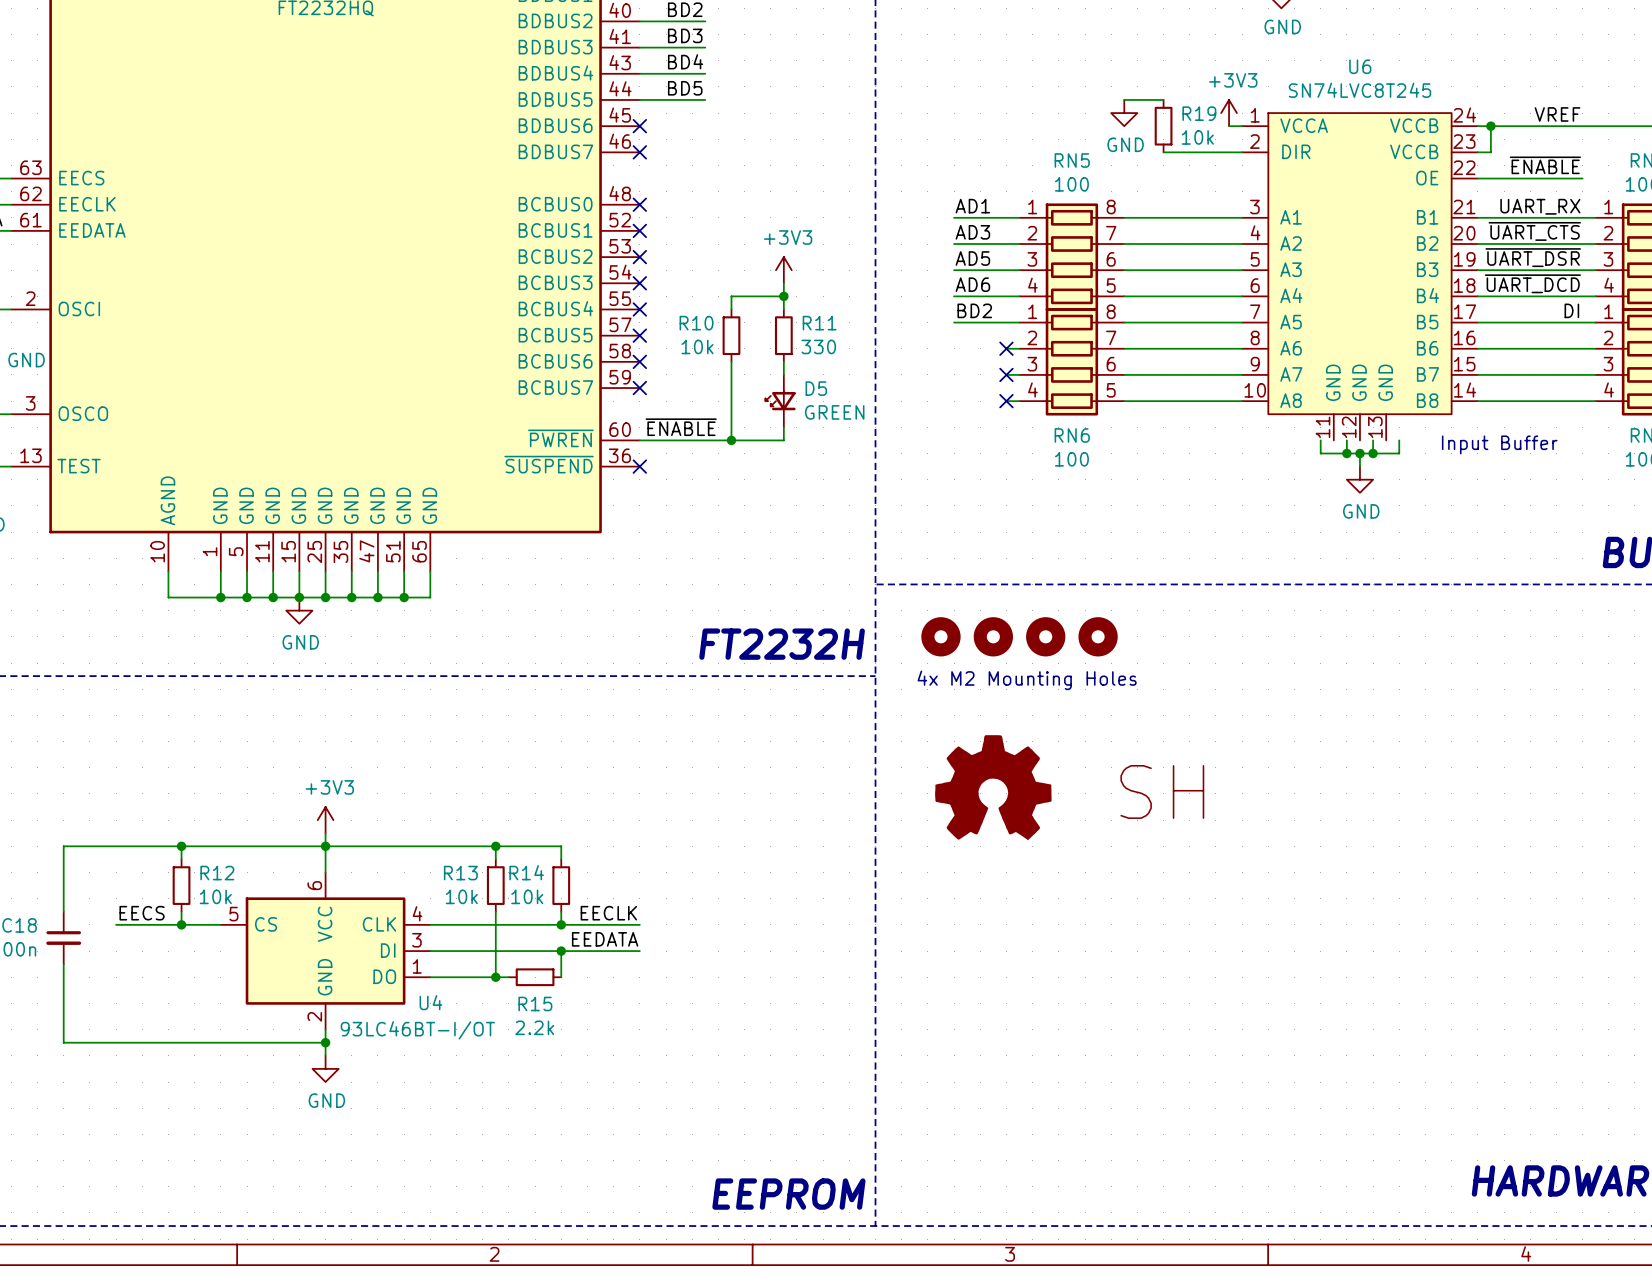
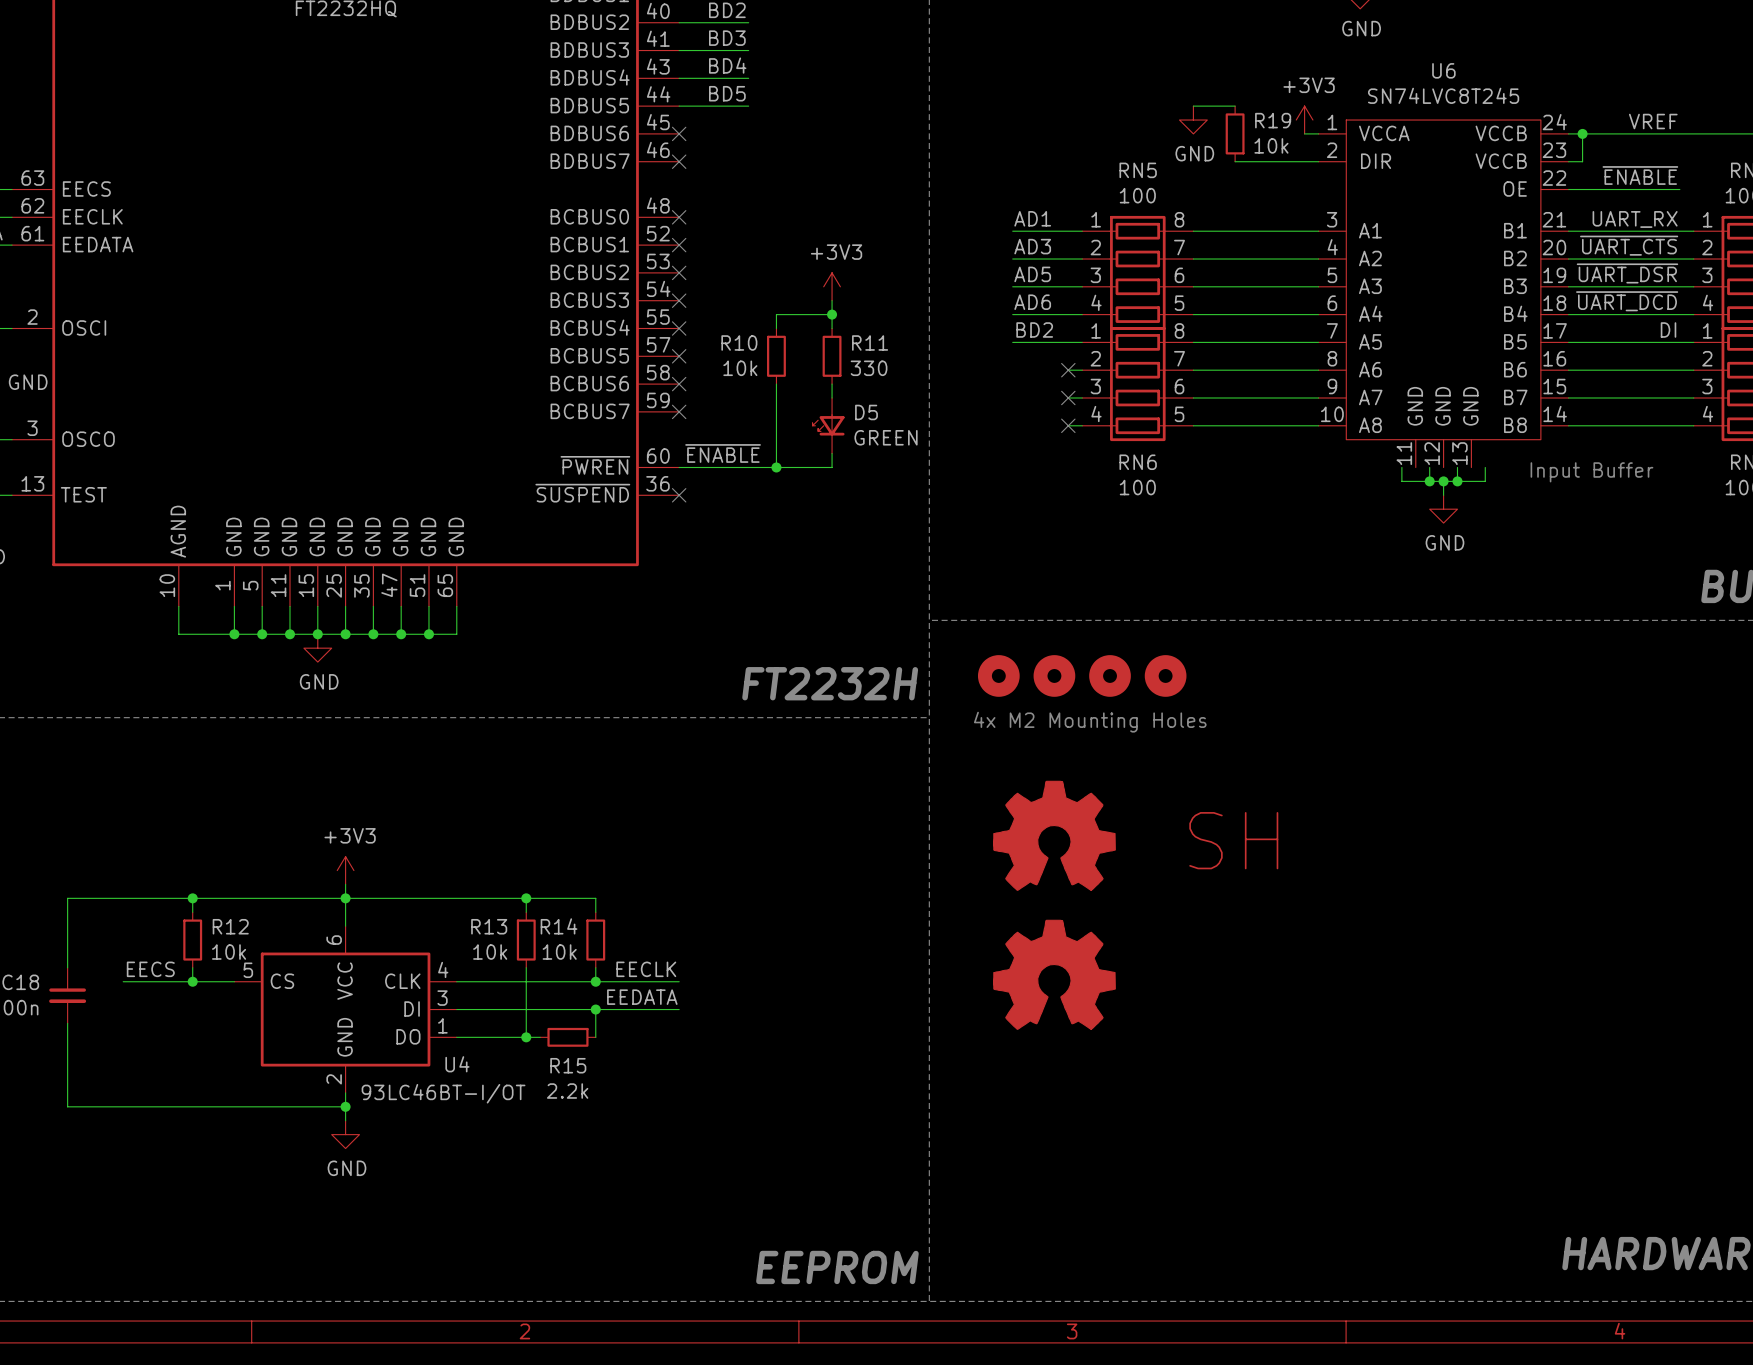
part: none -> (1054, 974)

